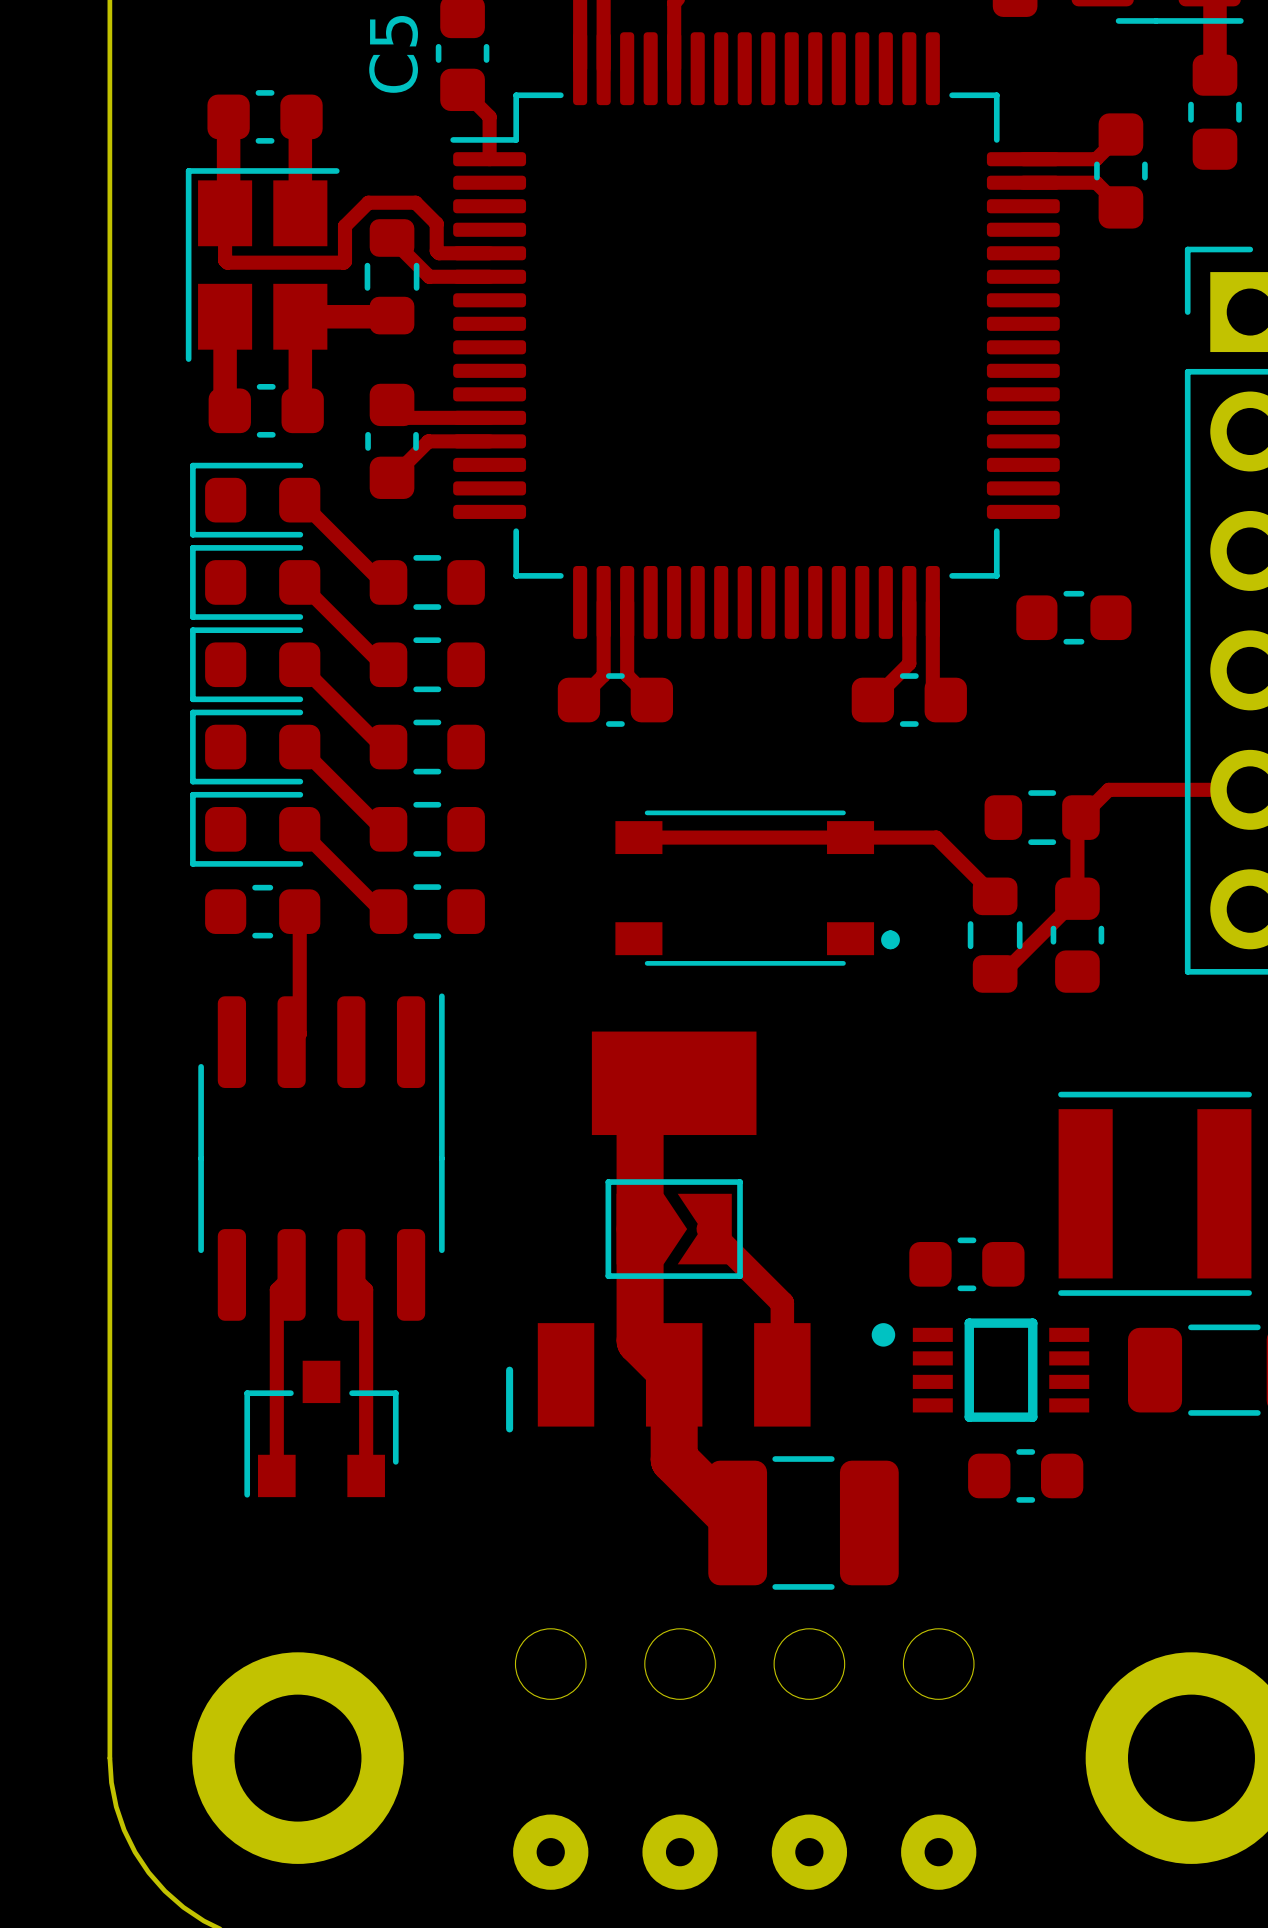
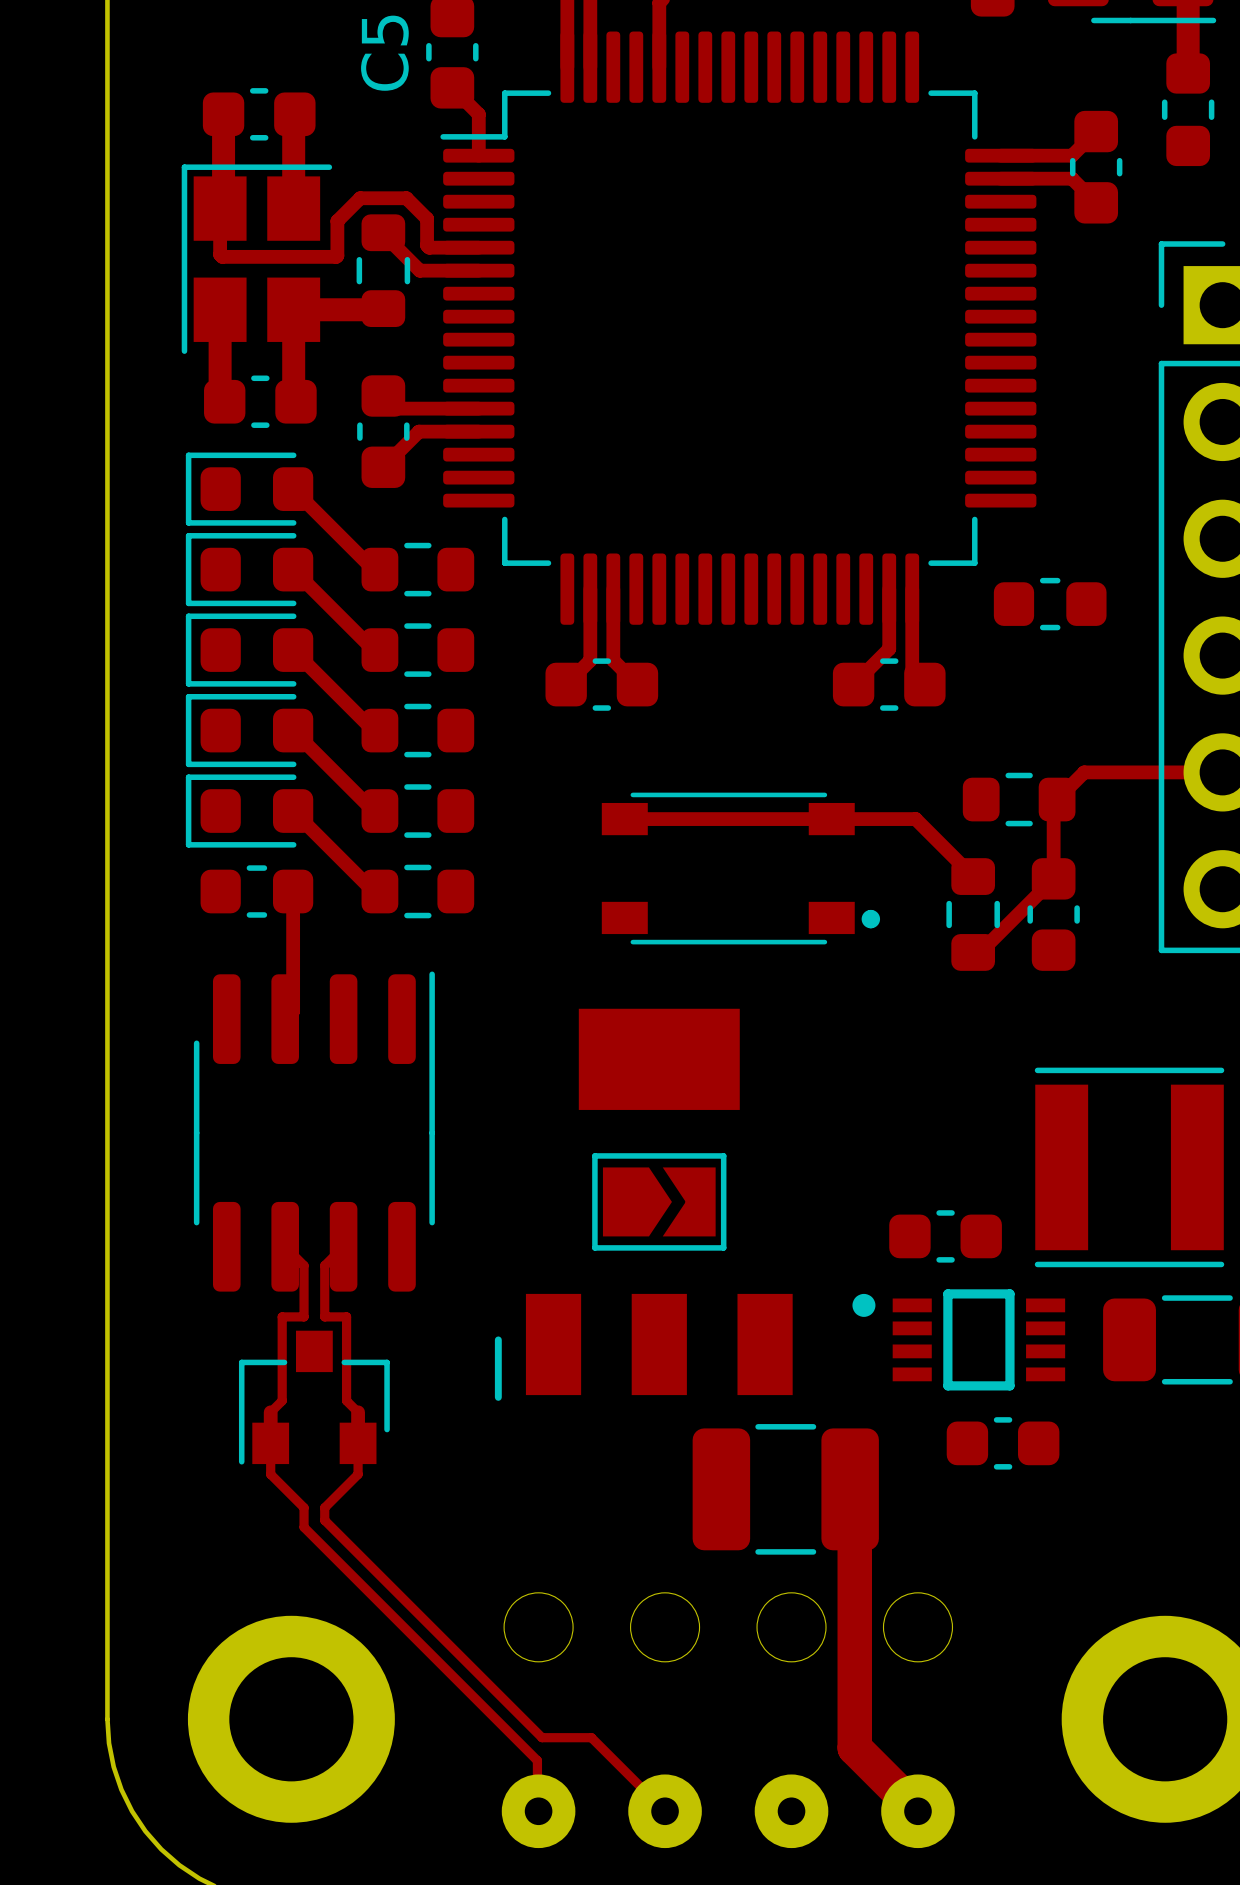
track: (674, 1083) (640, 1117) (640, 1340) (674, 1374) (674, 1459) (737, 1522) -> none
track: (708, 1229) (782, 1303) (782, 1374) -> none
track: (291, 1274) (276, 1289) (276, 1444) -> (285, 1246) (304, 1265) (304, 1316) (282, 1316) (282, 1400) (270, 1412)
track: (351, 1274) (366, 1289) (366, 1444) -> (343, 1246) (324, 1265) (324, 1316) (346, 1316) (346, 1400) (358, 1412)
track: none -> (270, 1443) (270, 1474) (304, 1507) (304, 1527) (537, 1760) (538, 1811)
track: none -> (358, 1443) (358, 1474) (324, 1507) (324, 1520) (542, 1737) (591, 1737) (665, 1811)
track: none -> (850, 1489) (854, 1493) (854, 1748) (917, 1811)

